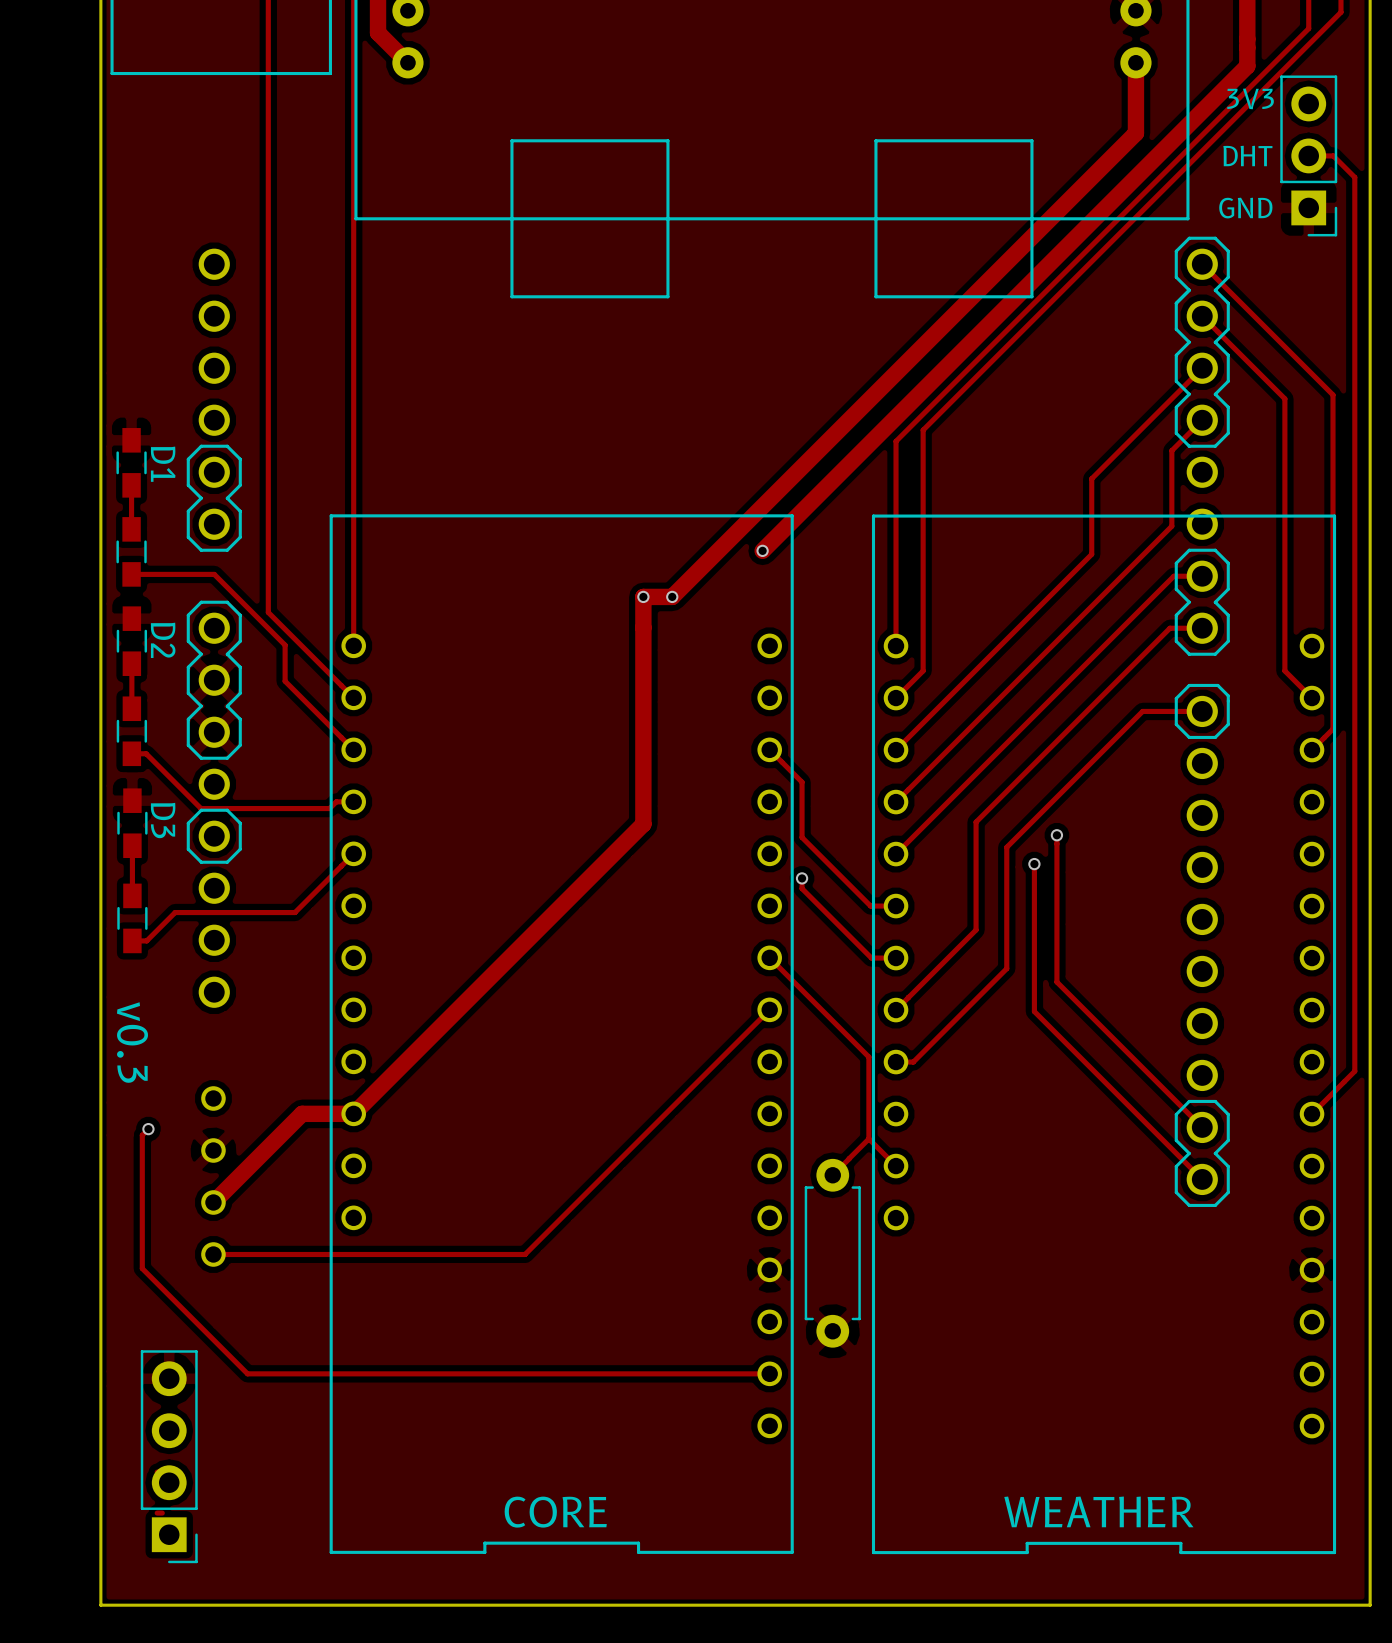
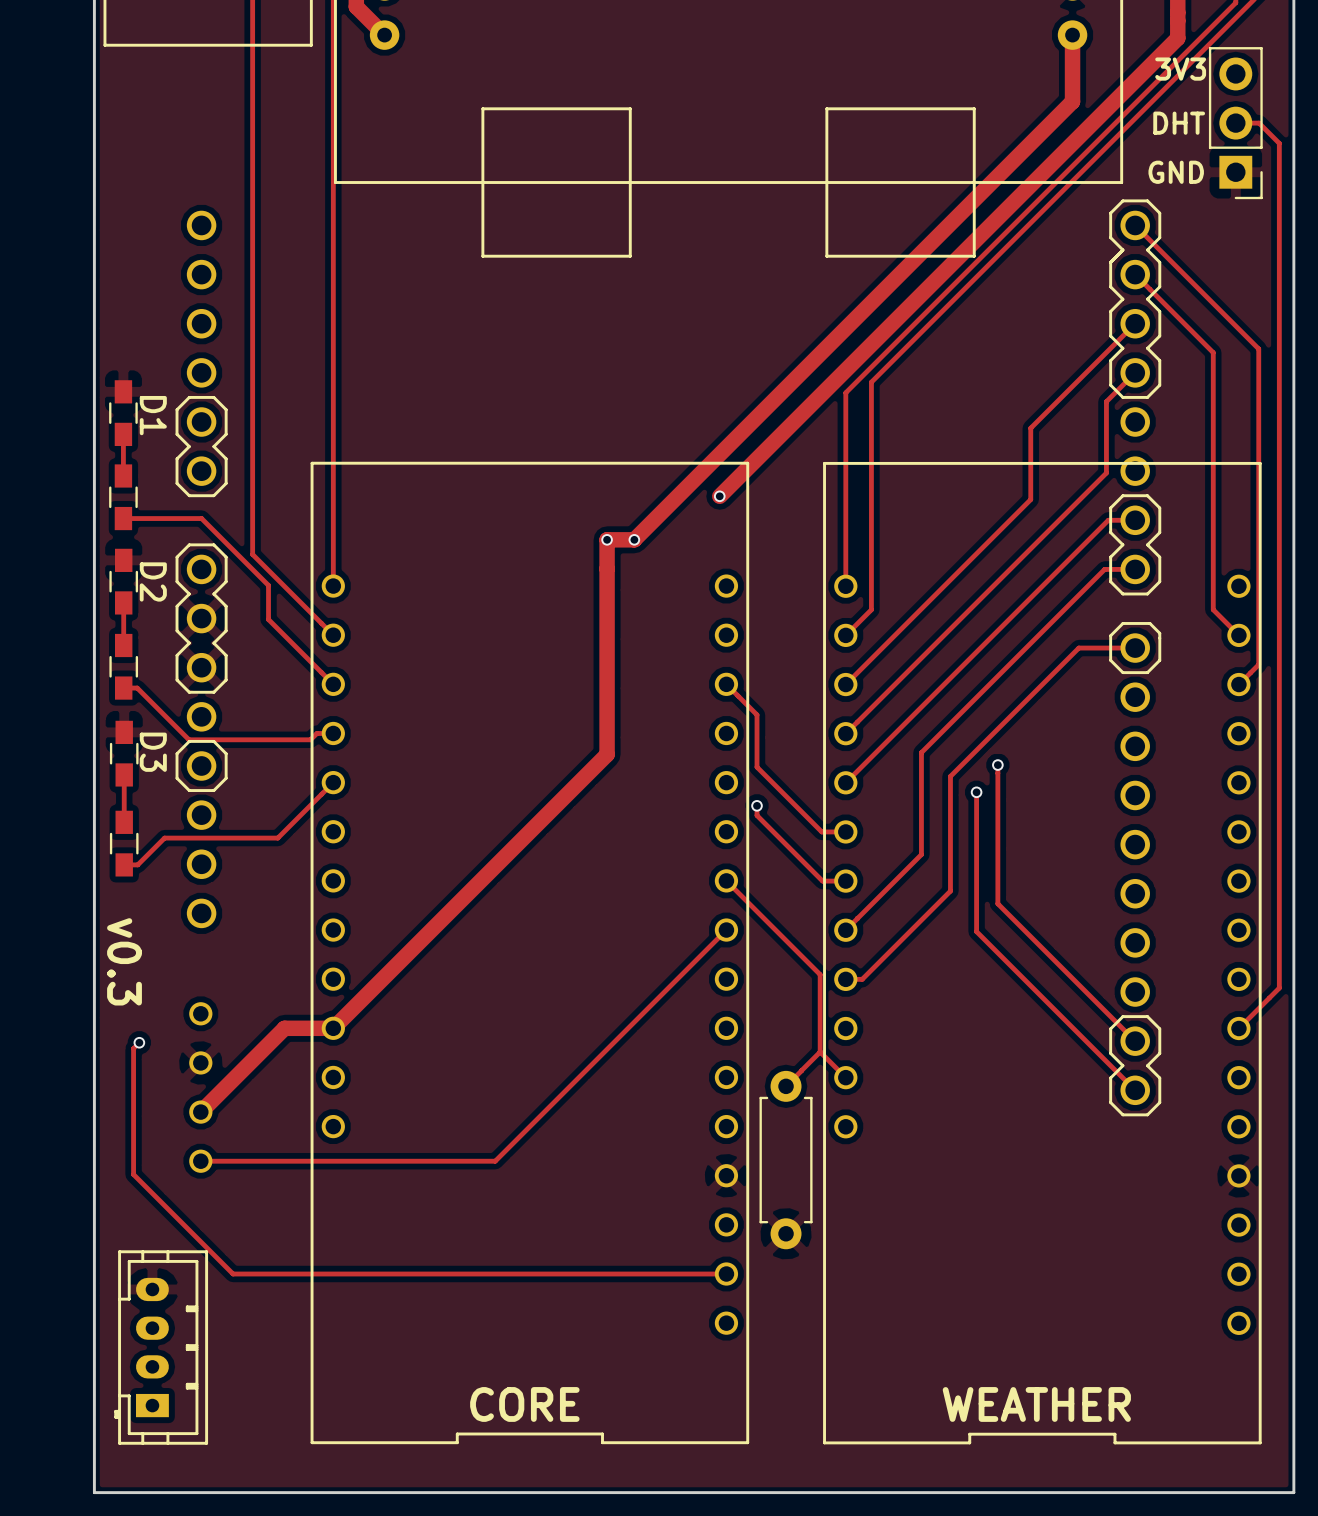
part footprint: [140, 1350, 198, 1564] -> [114, 1250, 209, 1445]

